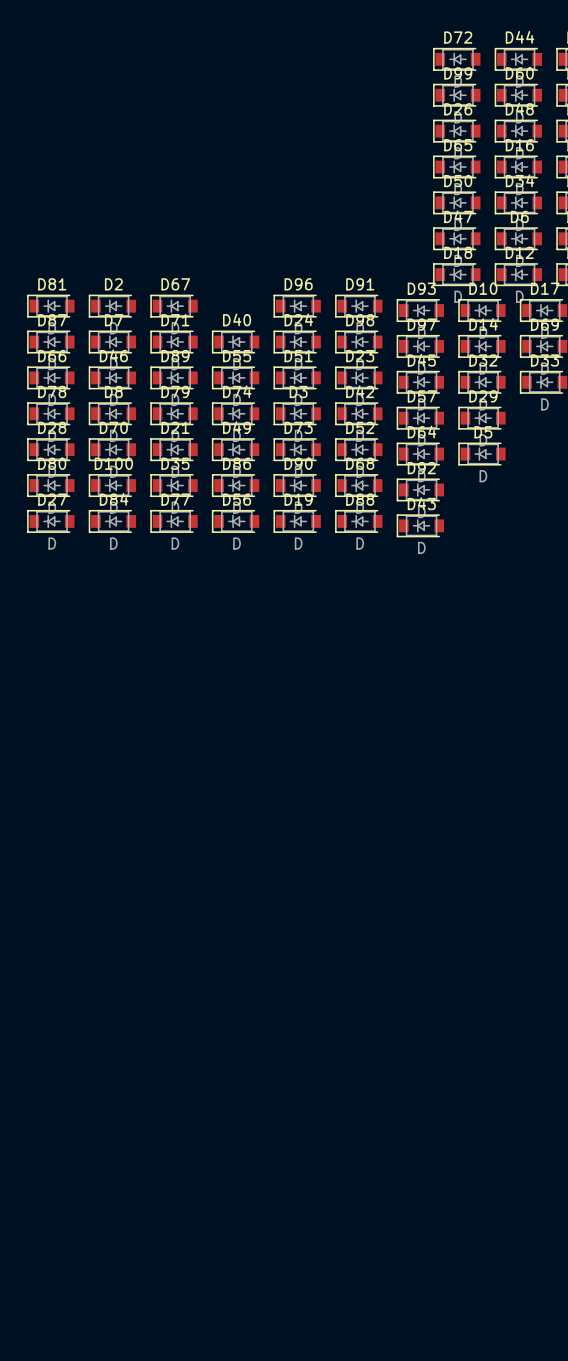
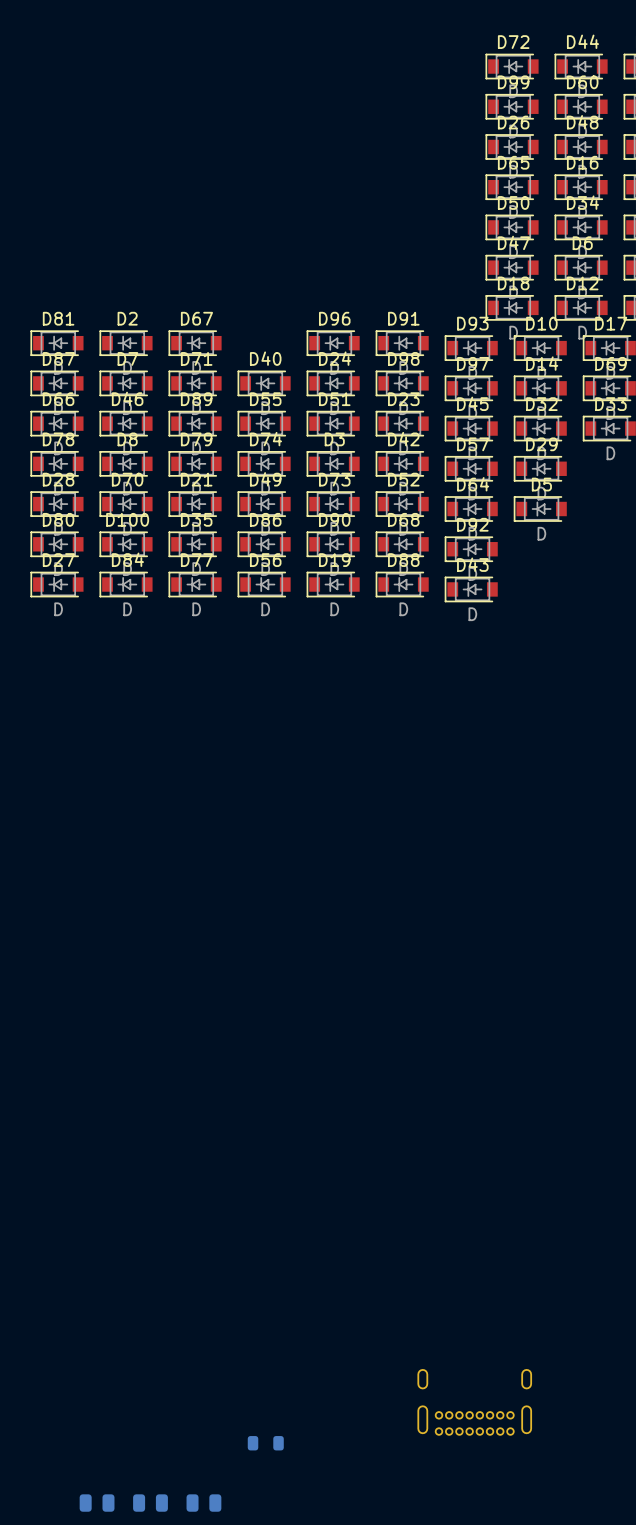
part: none -> (474, 1402)
part: none -> (265, 1443)
part: none -> (97, 1503)
part: none -> (150, 1503)
part: none -> (203, 1503)

